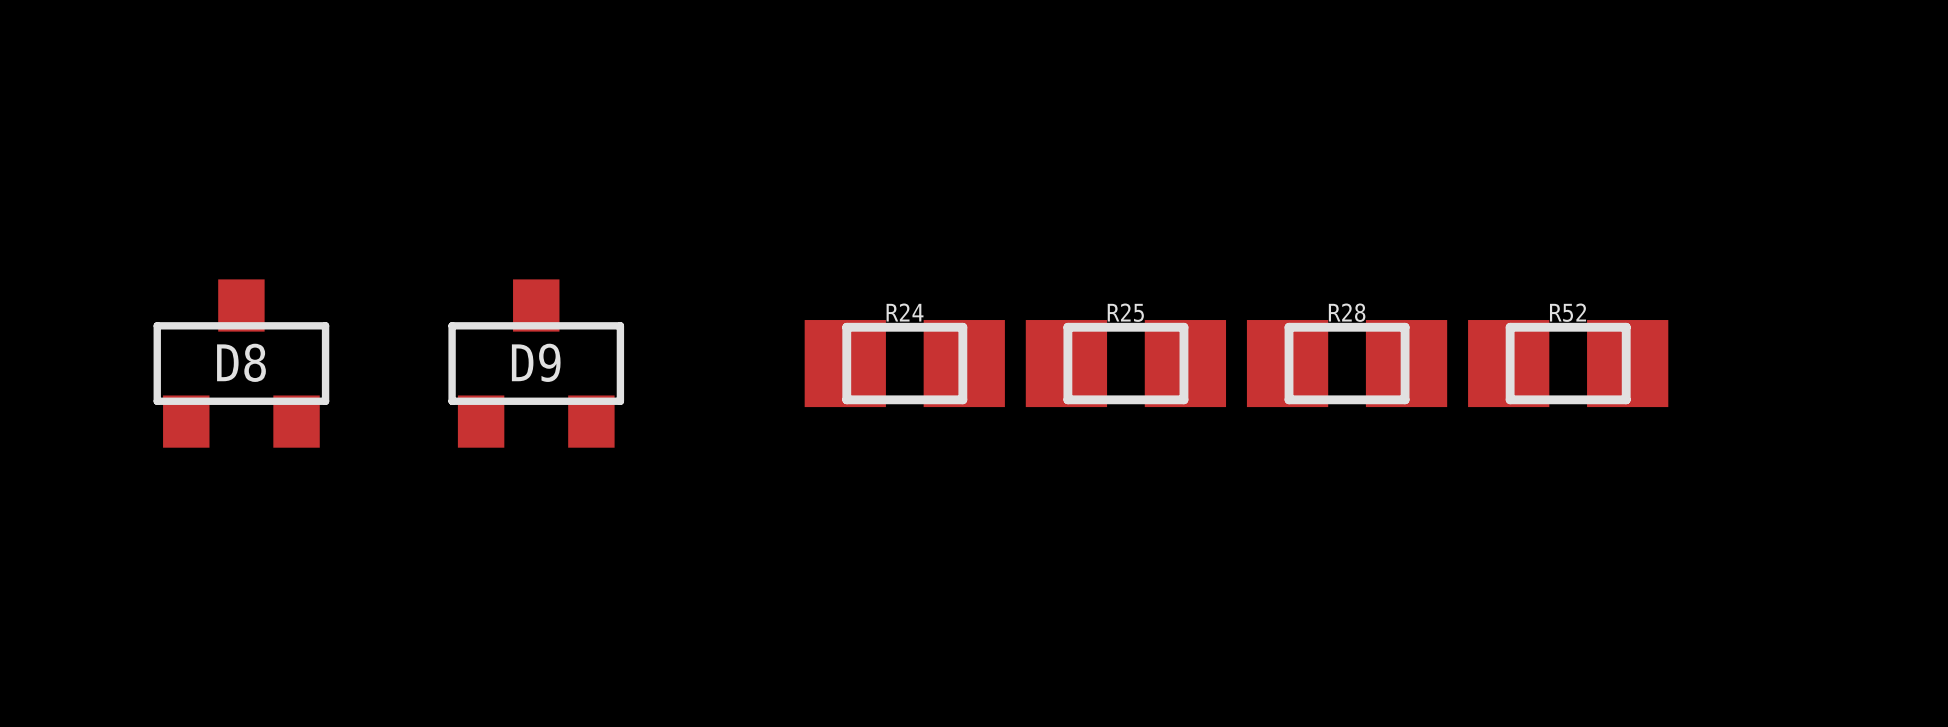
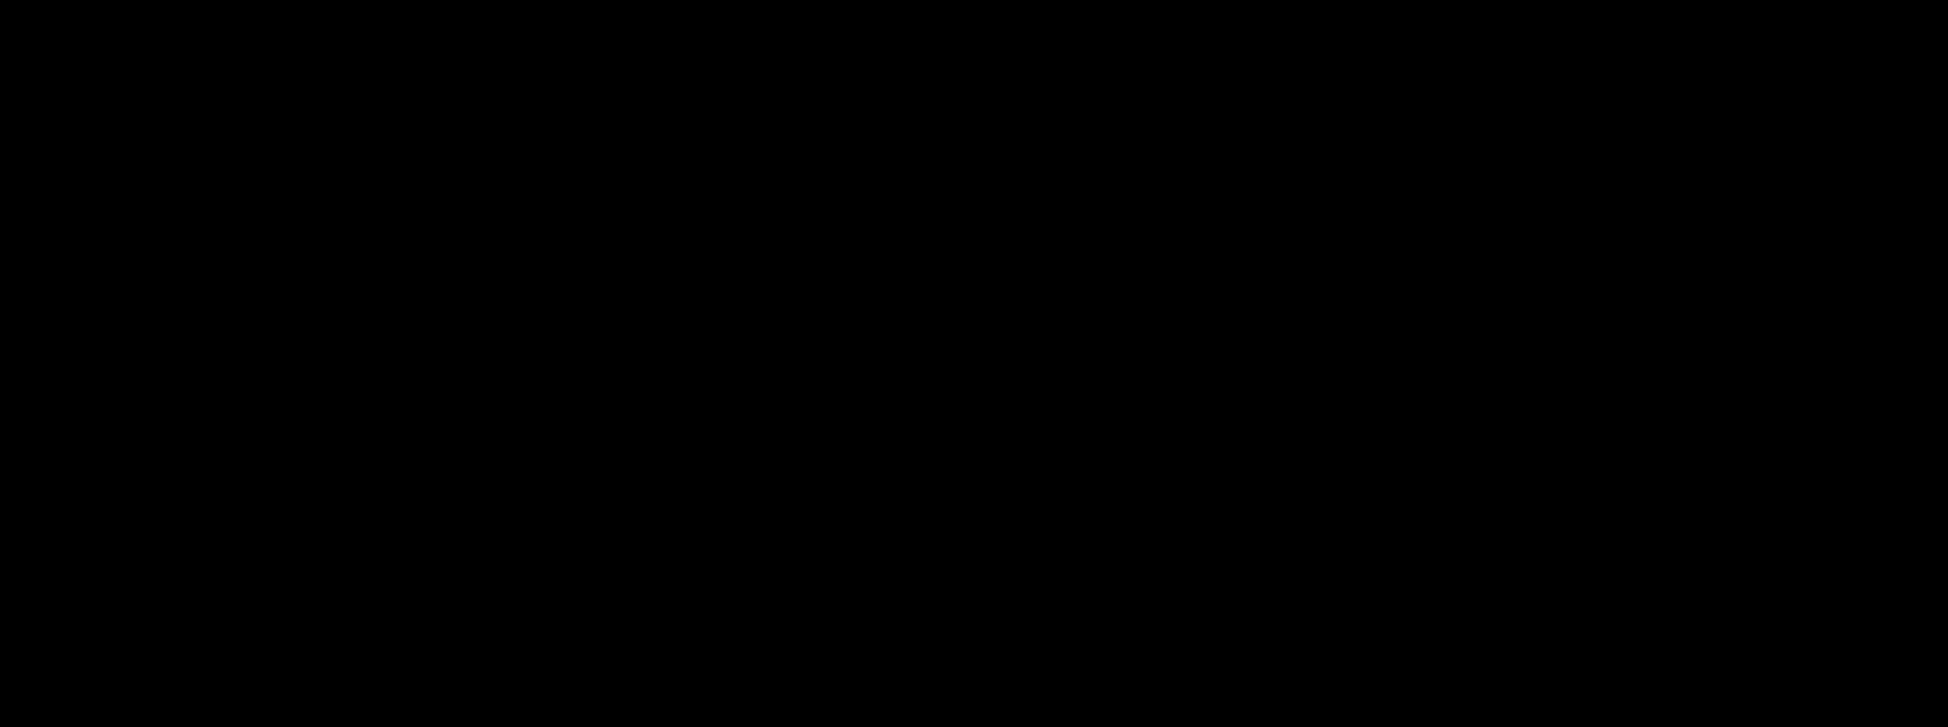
D8: (241, 363) -> none
D9: (536, 363) -> none
R24: (904, 363) -> none
R25: (1125, 363) -> none
R28: (1347, 363) -> none
R52: (1568, 363) -> none

